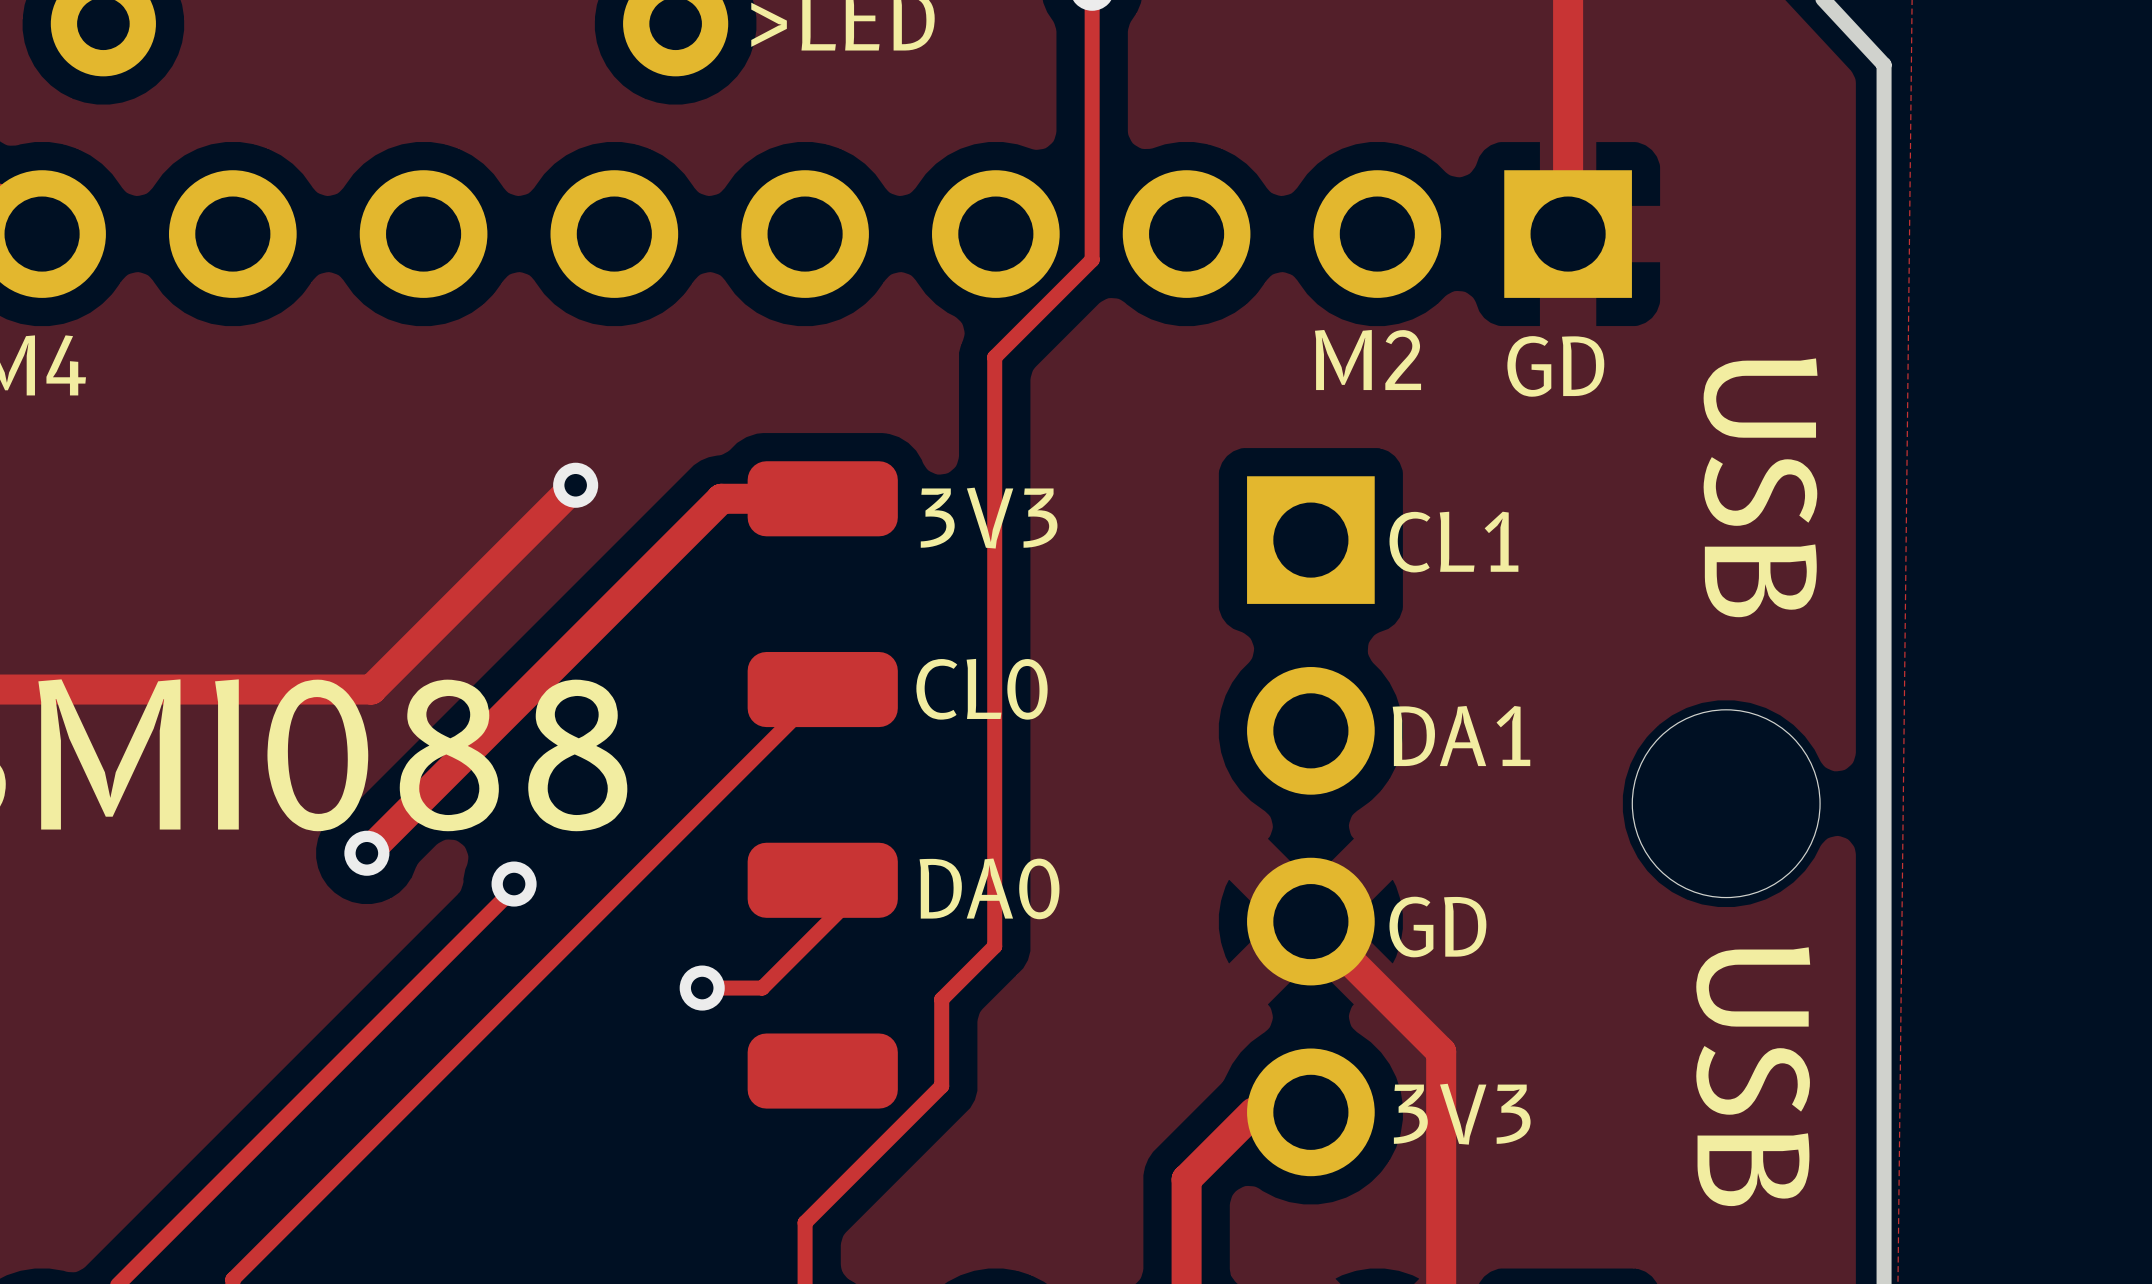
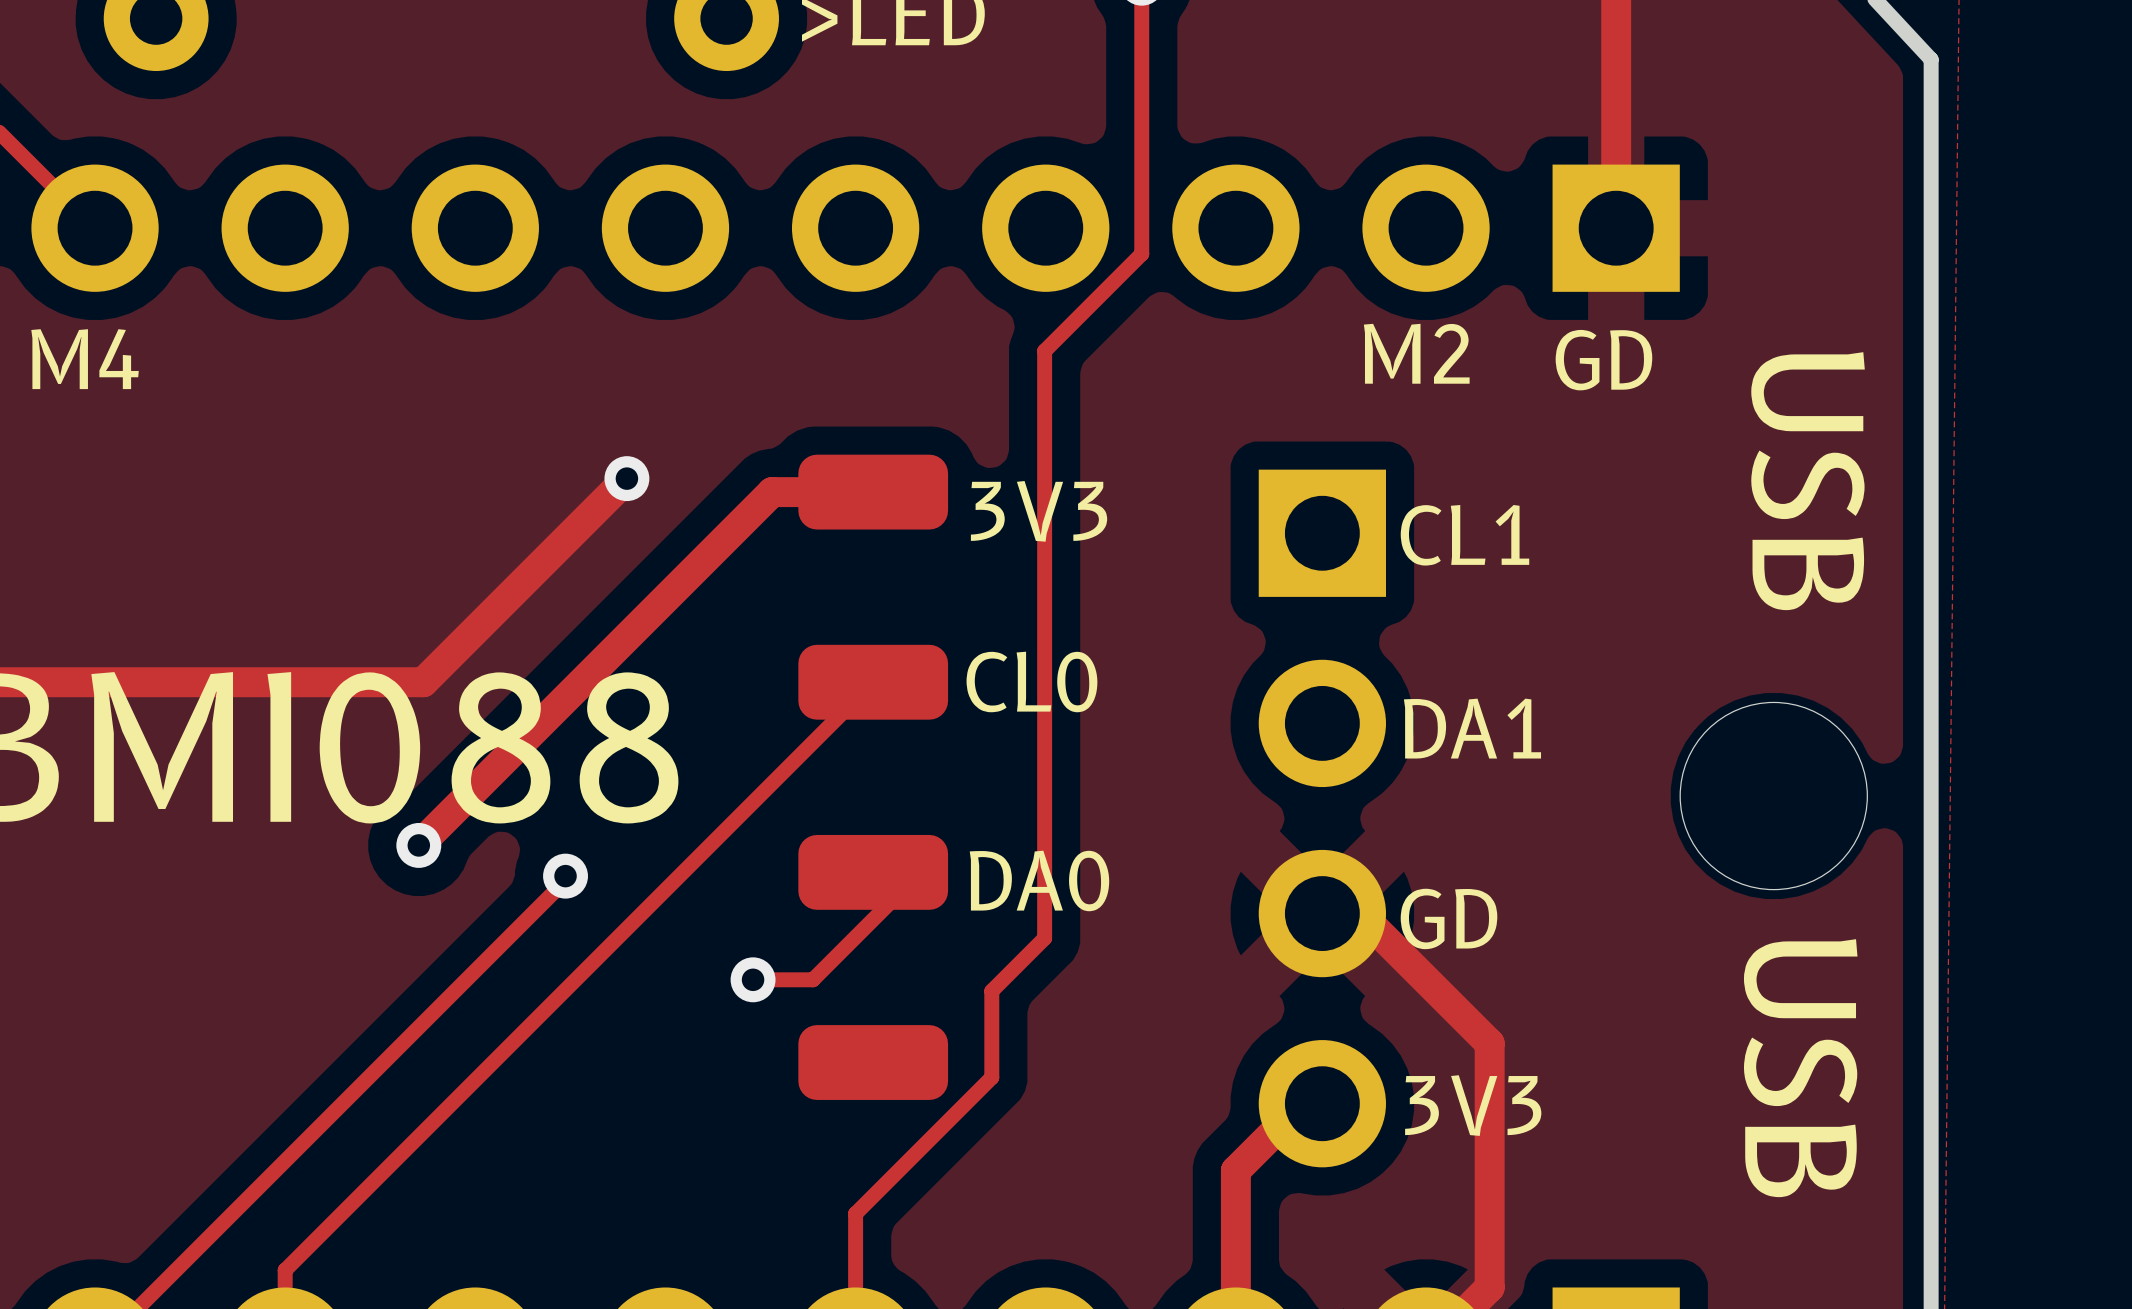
text position: CL1 (1453, 542) -> CL1 (1464, 535)
text position: DA1 (1461, 736) -> DA1 (1472, 728)
part position: (1310, 826) -> (1322, 818)
text position: GD (1437, 927) -> GD (1448, 918)
text position: 3V3 (1462, 1114) -> 3V3 (1473, 1105)

